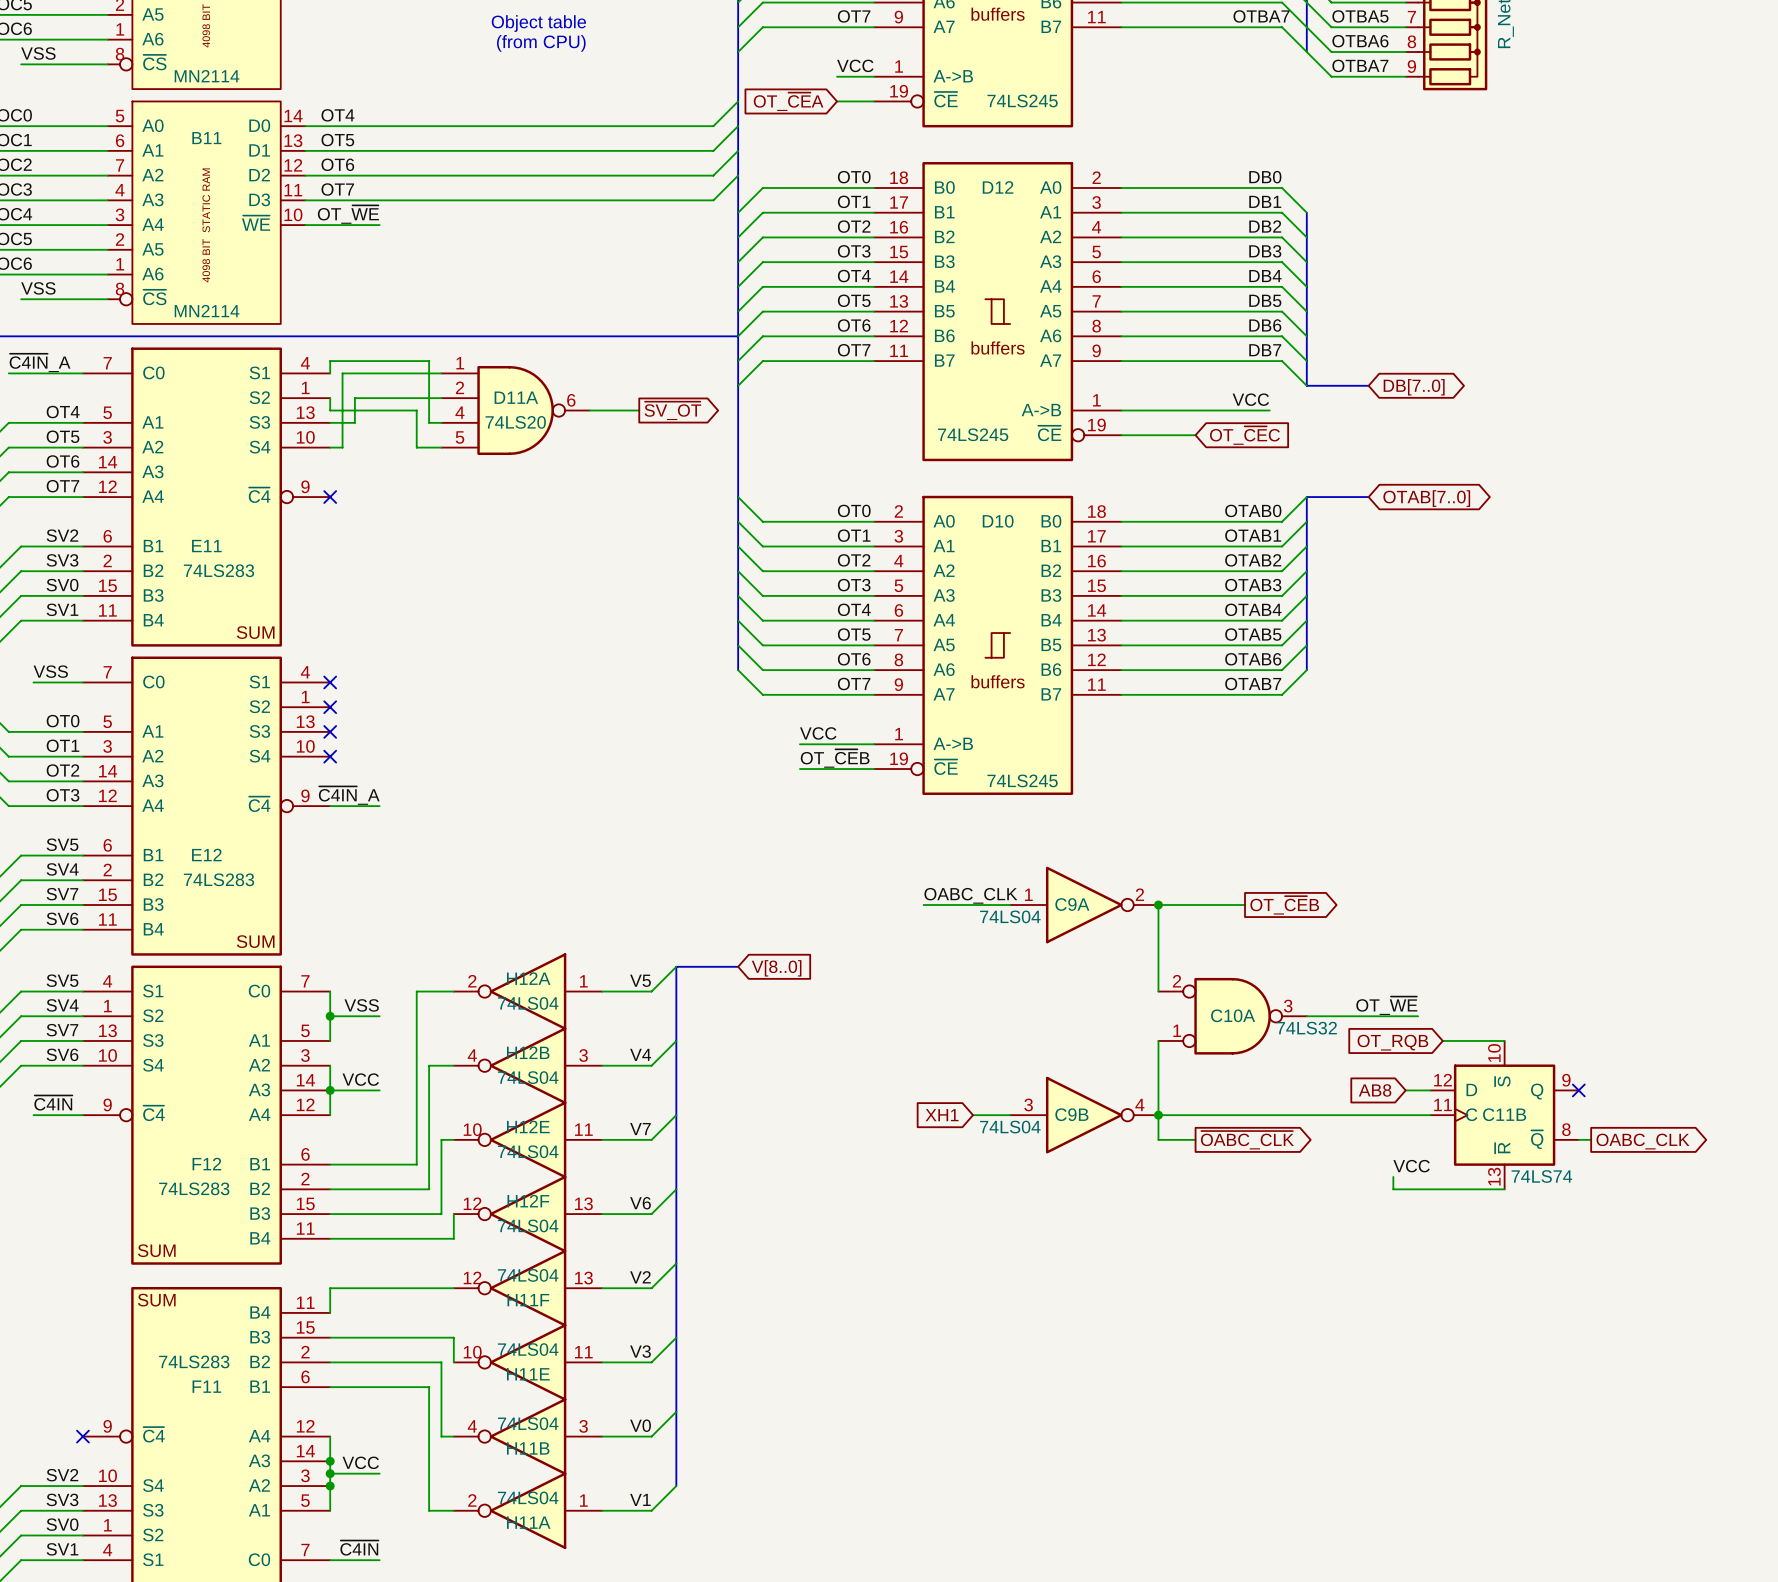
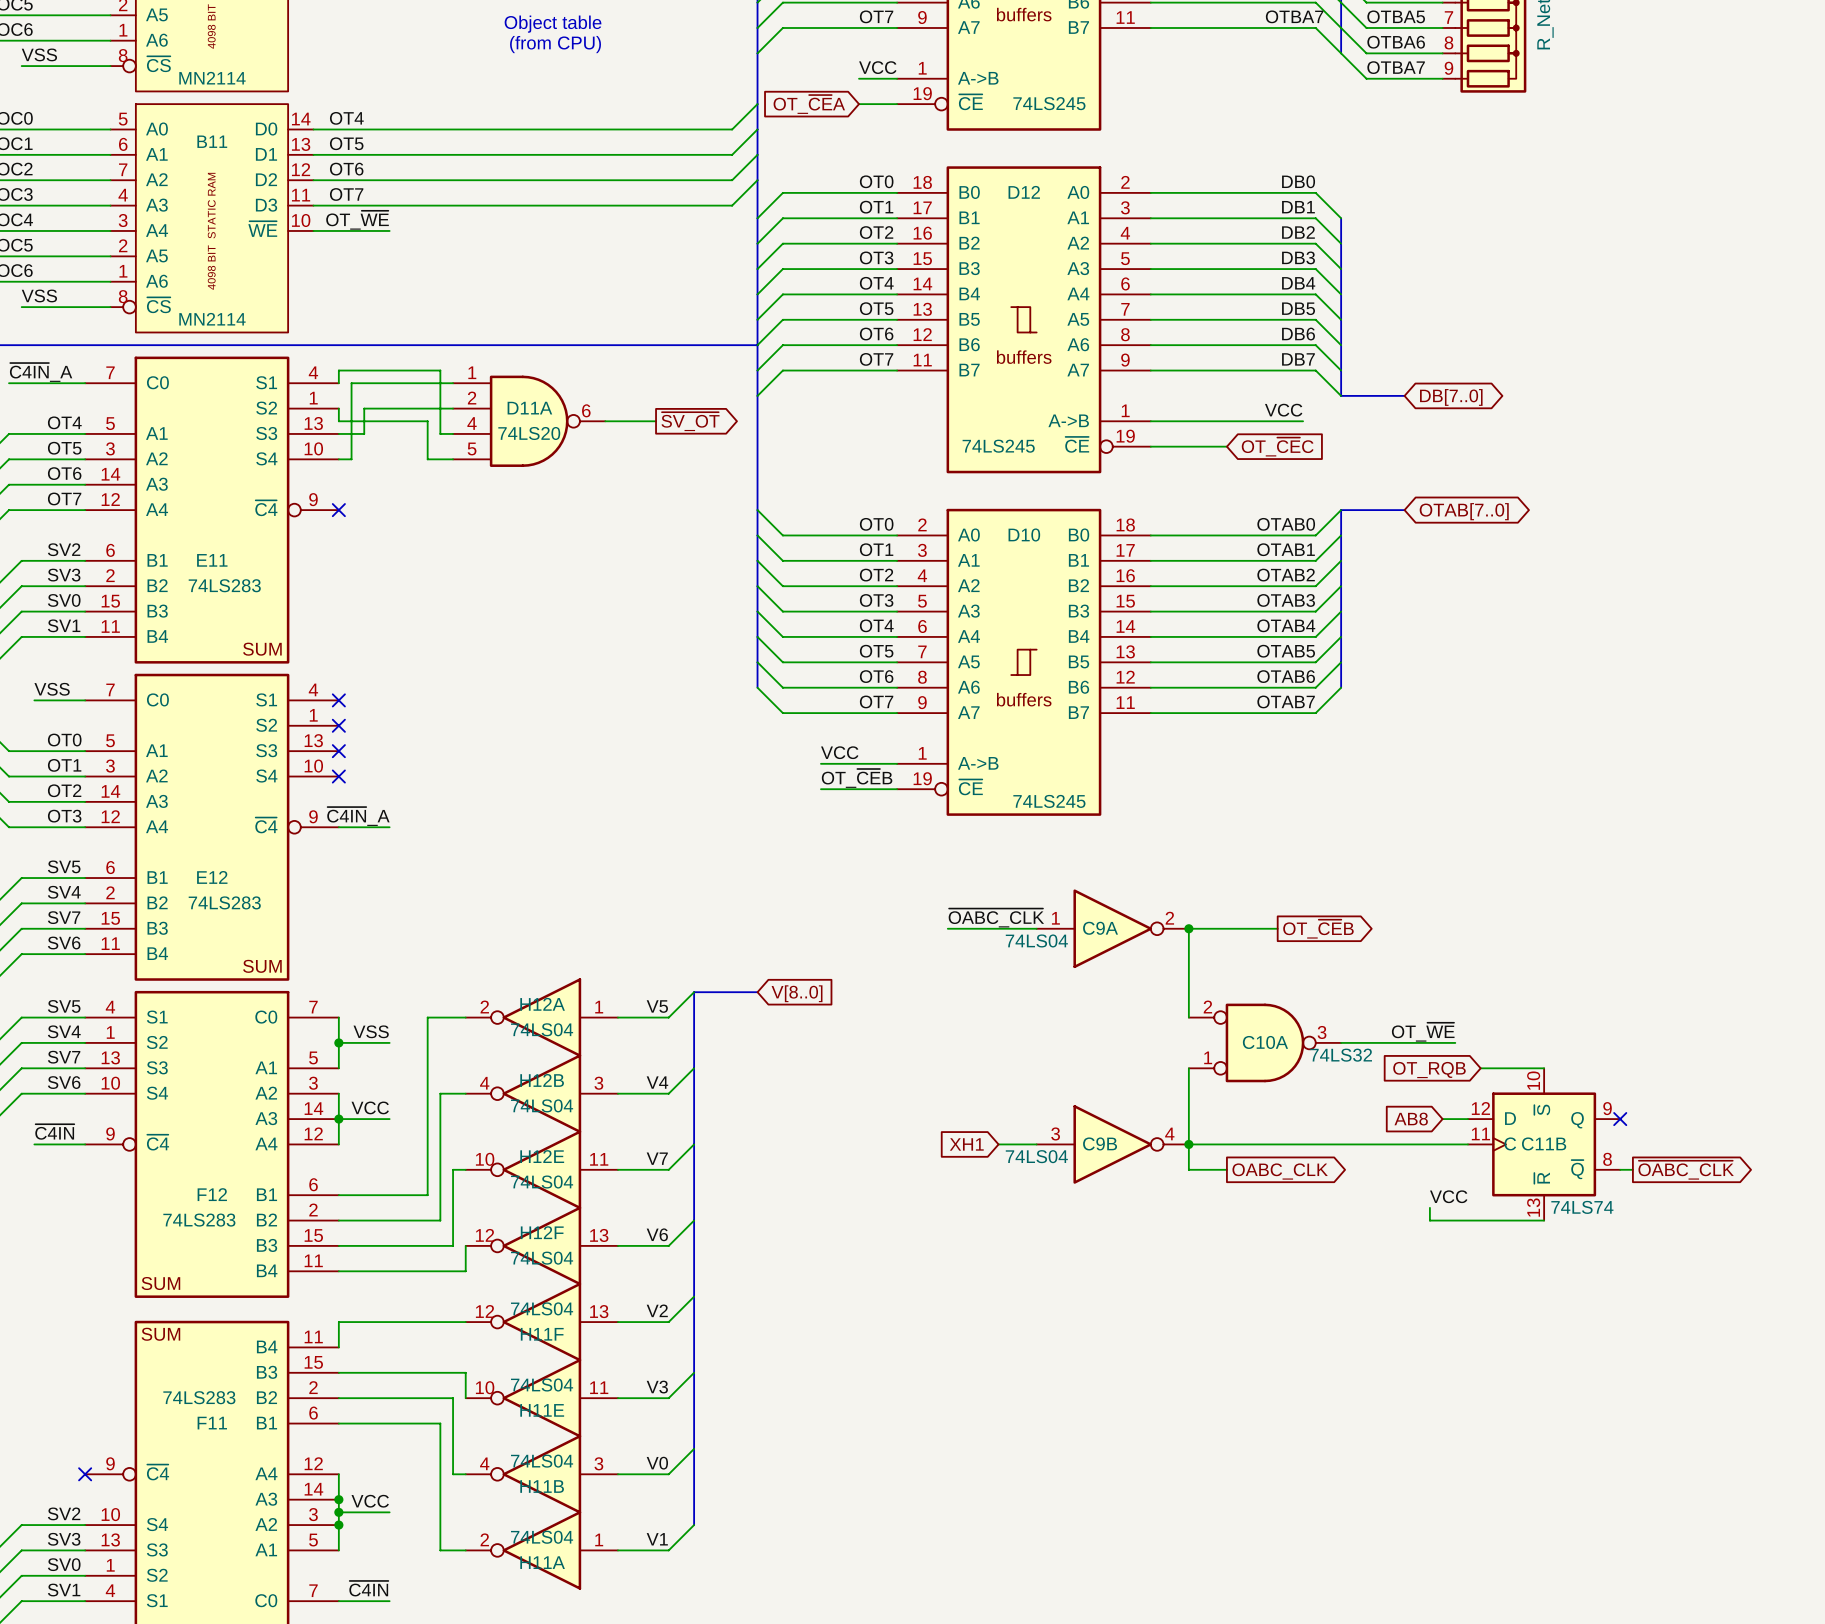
label: OABC_CLK (970, 895) -> ~{OABC_CLK} (996, 918)
global label: ~{OABC_CLK} (1247, 1140) -> OABC_CLK (1280, 1171)
global label: OABC_CLK (1642, 1141) -> ~{OABC_CLK} (1686, 1170)

